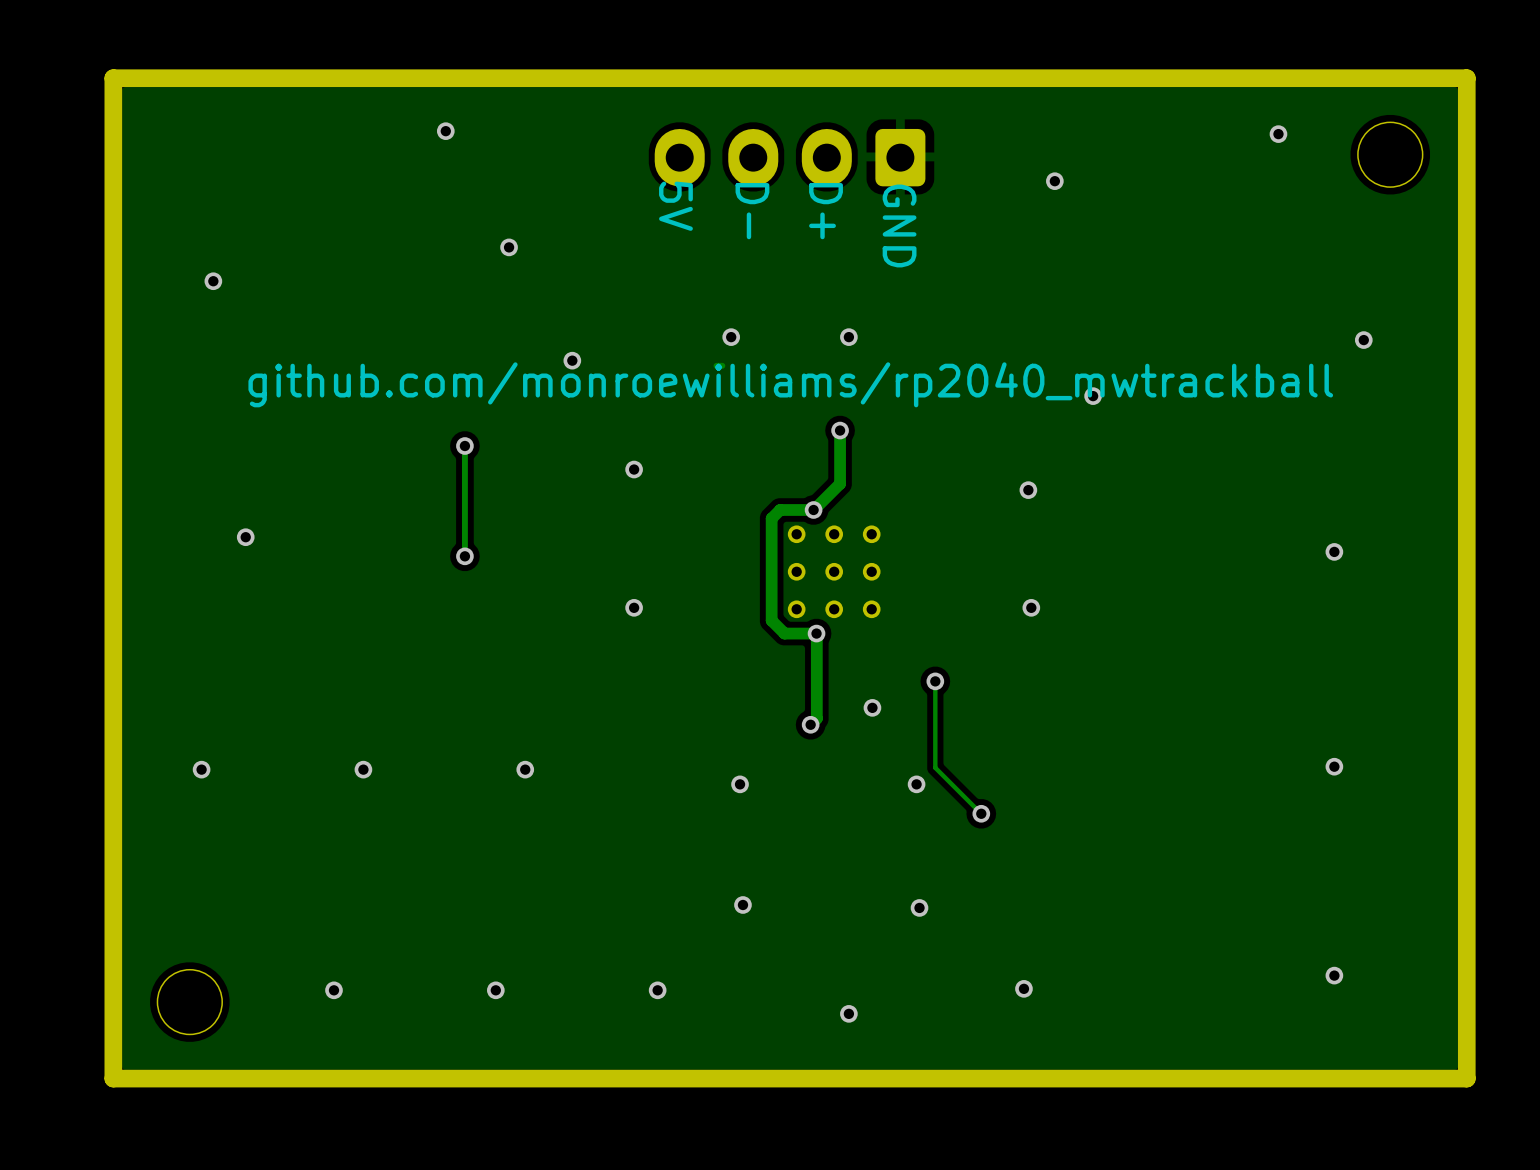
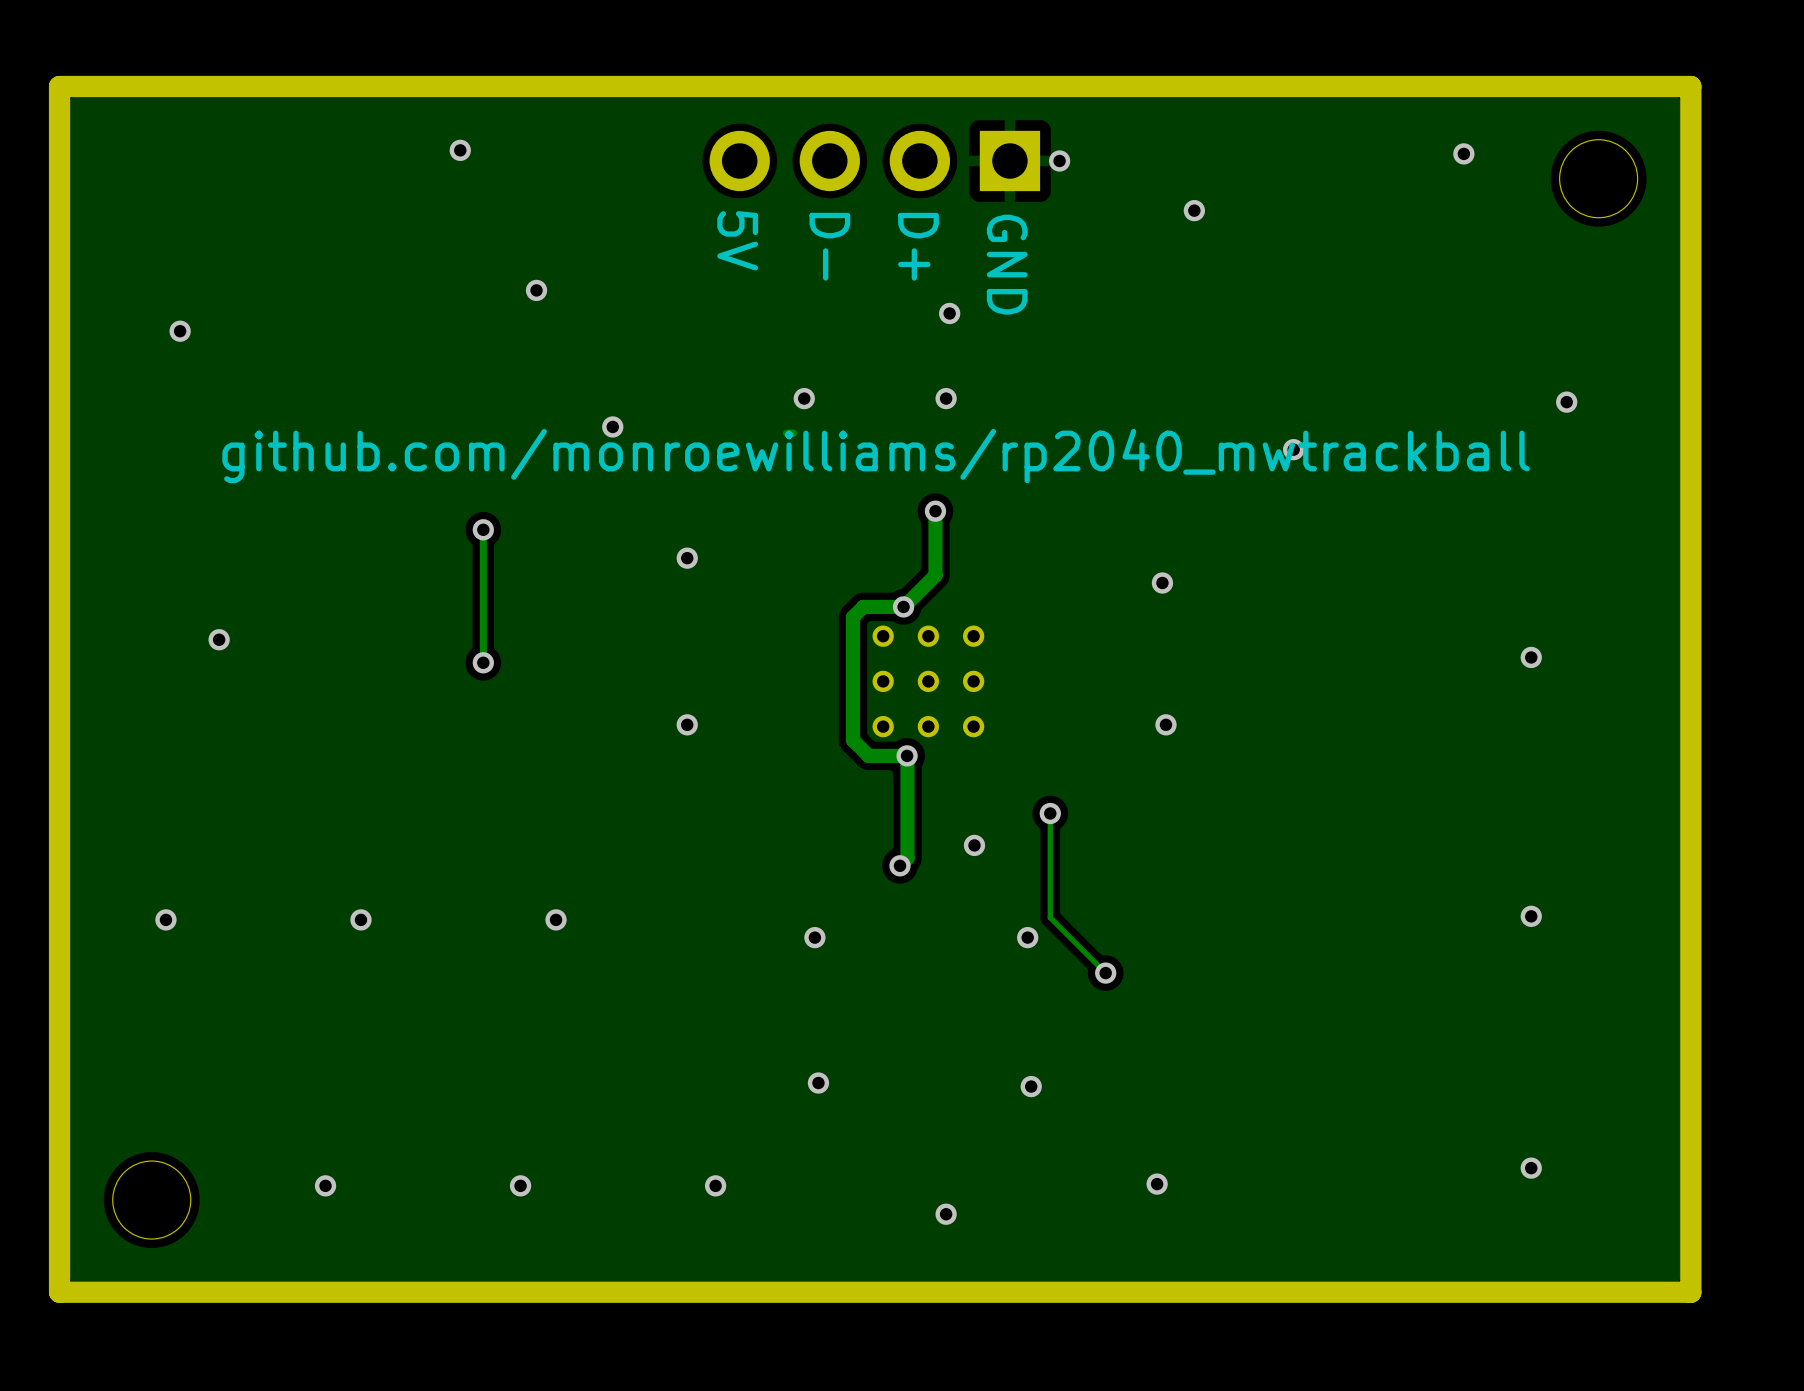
part footprint: [654, 128, 926, 187] -> [709, 130, 1041, 192]
via: none -> (1059, 160)
via: none -> (949, 313)
via position: (1093, 396) -> (1293, 449)

